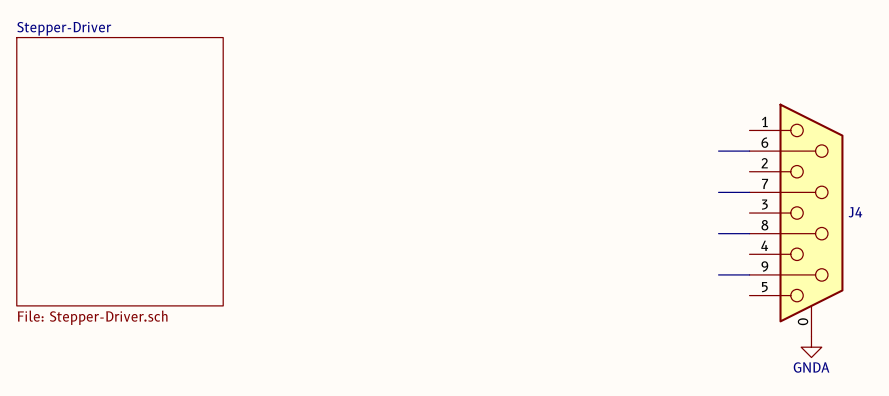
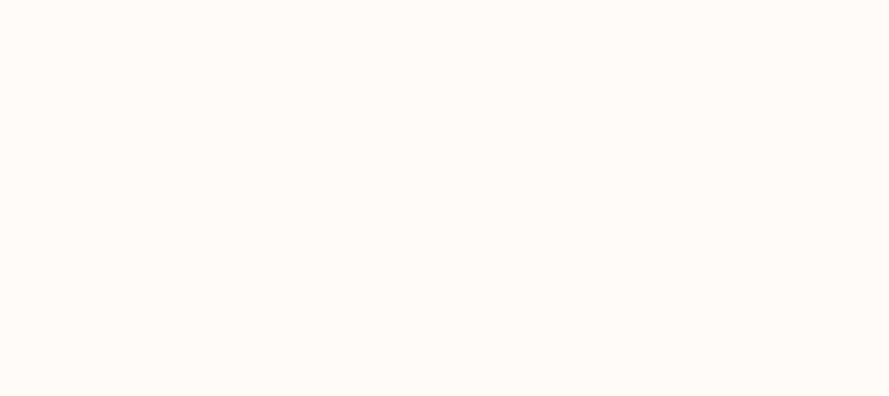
wire: (718, 151) (749, 151) -> none
sheet Stepper-Driver: File: Stepper-Driver.sch (119, 171) -> none
wire: (718, 192) (749, 192) -> none
J4: (796, 220) -> none
wire: (718, 233) (749, 233) -> none
wire: (718, 274) (749, 274) -> none
power symbol: GNDA (811, 347) -> none

